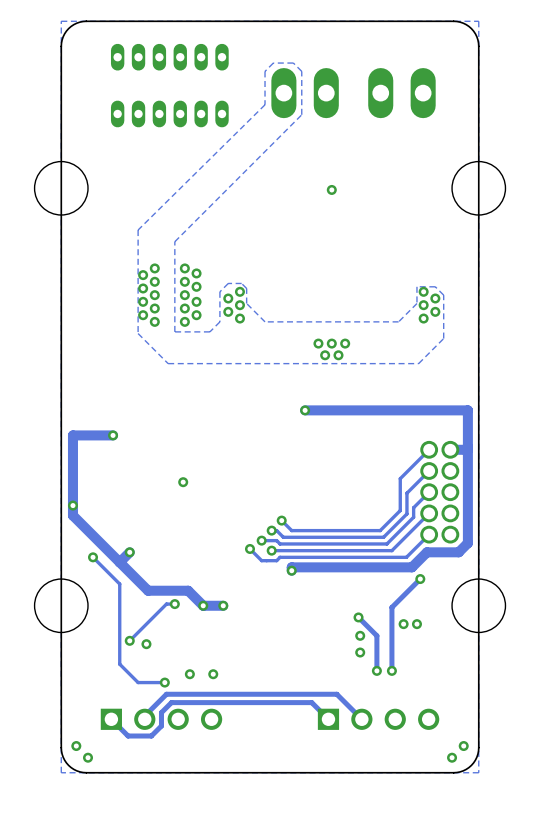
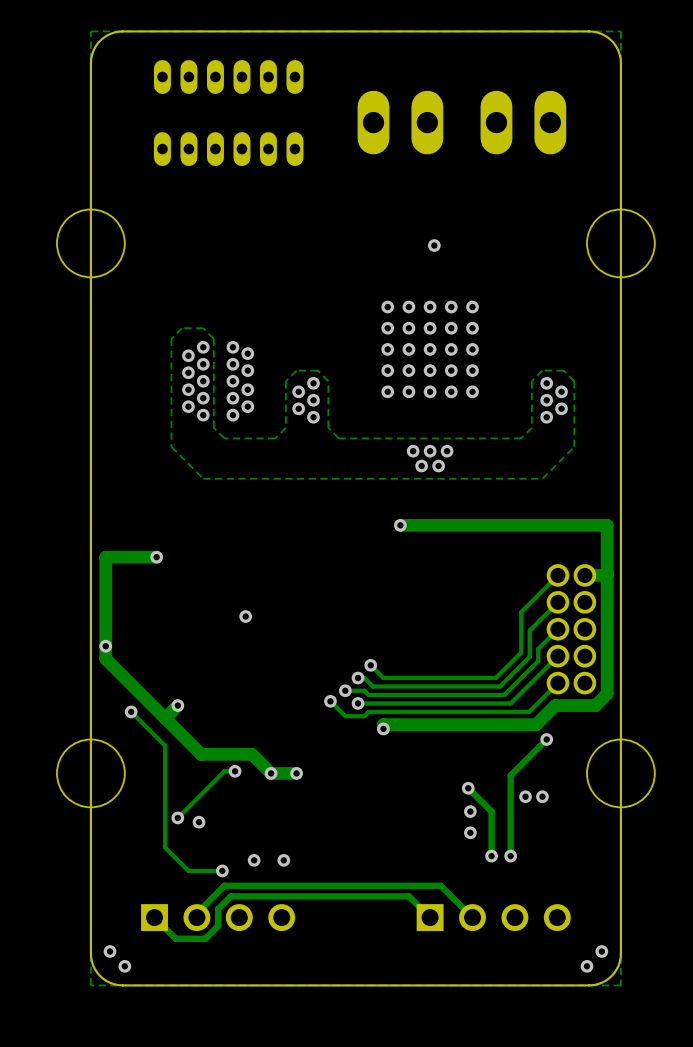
via: none -> (387, 307)
via: none -> (408, 307)
via: none -> (430, 307)
via: none -> (451, 307)
via: none -> (472, 307)
via: none -> (387, 328)
via: none -> (408, 328)
via: none -> (430, 328)
via: none -> (451, 328)
via: none -> (472, 328)
via: (154, 268) -> none
via: (184, 268) -> none
via: none -> (203, 347)
via: none -> (232, 347)
via: none -> (387, 349)
via: none -> (408, 349)
via: none -> (430, 349)
via: none -> (451, 349)
via: none -> (472, 349)
via: (196, 273) -> none
via: (143, 275) -> none
via: none -> (247, 353)
via: none -> (188, 355)
via: (154, 281) -> none
via: (184, 281) -> none
via: none -> (203, 364)
via: none -> (232, 364)
via: (196, 286) -> none
via: (143, 288) -> none
via: none -> (247, 370)
zone outline: (223, 288) (228, 283) (241, 283) (246, 288) (246, 303) (265, 321) (398, 321) (416, 303) (416, 286) (435, 286) (443, 295) (443, 338) (418, 363) (168, 363) (138, 333) (138, 230) (265, 104) (265, 71) (273, 63) (293, 63) (301, 71) (301, 114) (174, 241) (174, 331) (209, 331) (219, 321) (219, 291) -> (296, 370) (317, 370) (328, 381) (328, 427) (338, 438) (521, 438) (531, 427) (531, 381) (542, 370) (563, 370) (574, 381) (574, 446) (542, 478) (203, 478) (171, 446) (171, 338) (182, 328) (203, 328) (213, 338) (213, 427) (224, 438) (275, 438) (285, 427) (285, 381) (292, 374)
via: none -> (387, 370)
via: none -> (408, 370)
via: none -> (430, 370)
via: none -> (451, 370)
via: none -> (472, 370)
via: none -> (188, 372)
via: (239, 291) -> none
via: (423, 291) -> none
via: (154, 295) -> none
via: (184, 295) -> none
via: none -> (203, 381)
via: none -> (232, 381)
via: (228, 298) -> none
via: none -> (313, 383)
via: none -> (546, 383)
via: (435, 298) -> none
via: (143, 301) -> none
via: (196, 301) -> none
via: none -> (188, 389)
via: none -> (247, 389)
via: none -> (298, 391)
via: (239, 305) -> none
via: none -> (387, 391)
via: none -> (408, 391)
via: none -> (430, 391)
via: none -> (451, 391)
via: none -> (472, 391)
via: (423, 305) -> none
via: none -> (561, 391)
via: (154, 308) -> none
via: (184, 308) -> none
via: none -> (203, 398)
via: none -> (232, 398)
via: (228, 311) -> none
via: none -> (313, 400)
via: none -> (546, 400)
via: (435, 311) -> none
via: (143, 315) -> none
via: (196, 315) -> none
via: none -> (188, 406)
via: none -> (247, 406)
via: none -> (298, 408)
via: (239, 318) -> none
via: (423, 318) -> none
via: none -> (561, 408)
via: (154, 321) -> none
via: (184, 321) -> none
via: none -> (203, 415)
via: none -> (232, 415)
via: none -> (313, 417)
via: none -> (546, 417)
via: (318, 343) -> none
via: (331, 343) -> none
via: (345, 343) -> none
via: none -> (413, 451)
via: none -> (430, 451)
via: none -> (447, 451)
via: (325, 355) -> none
via: (338, 355) -> none
via: none -> (421, 466)
via: none -> (438, 466)

